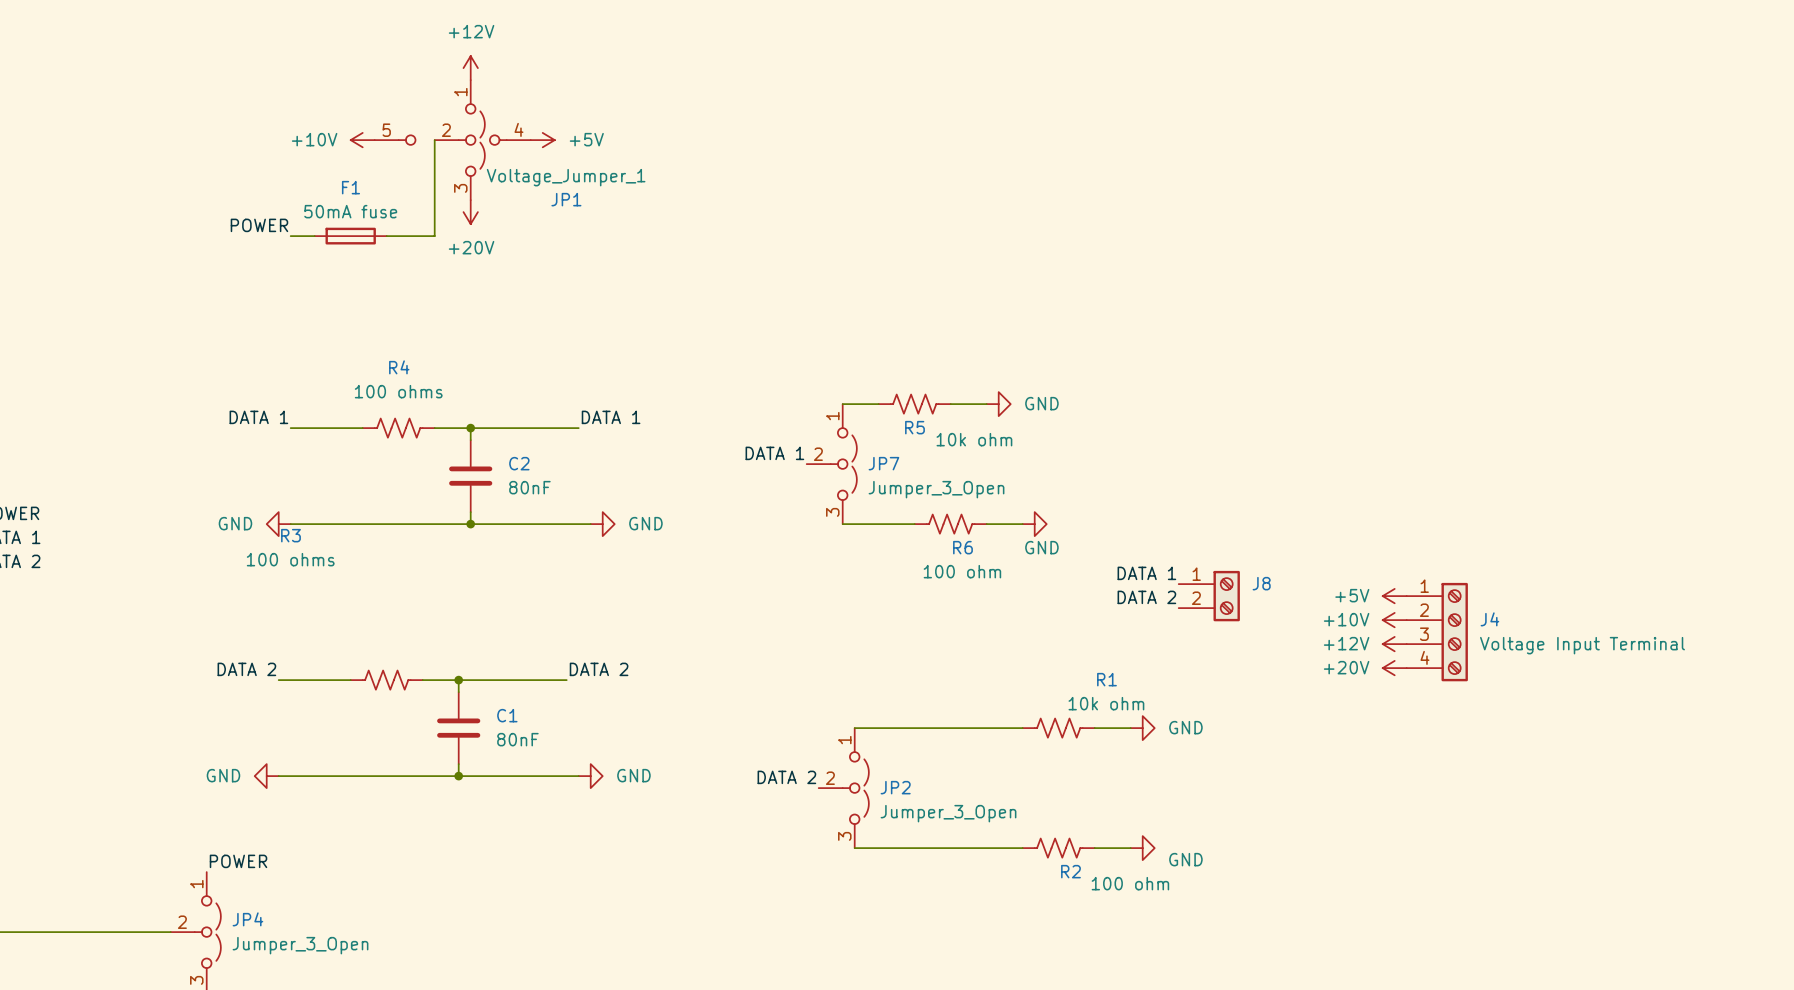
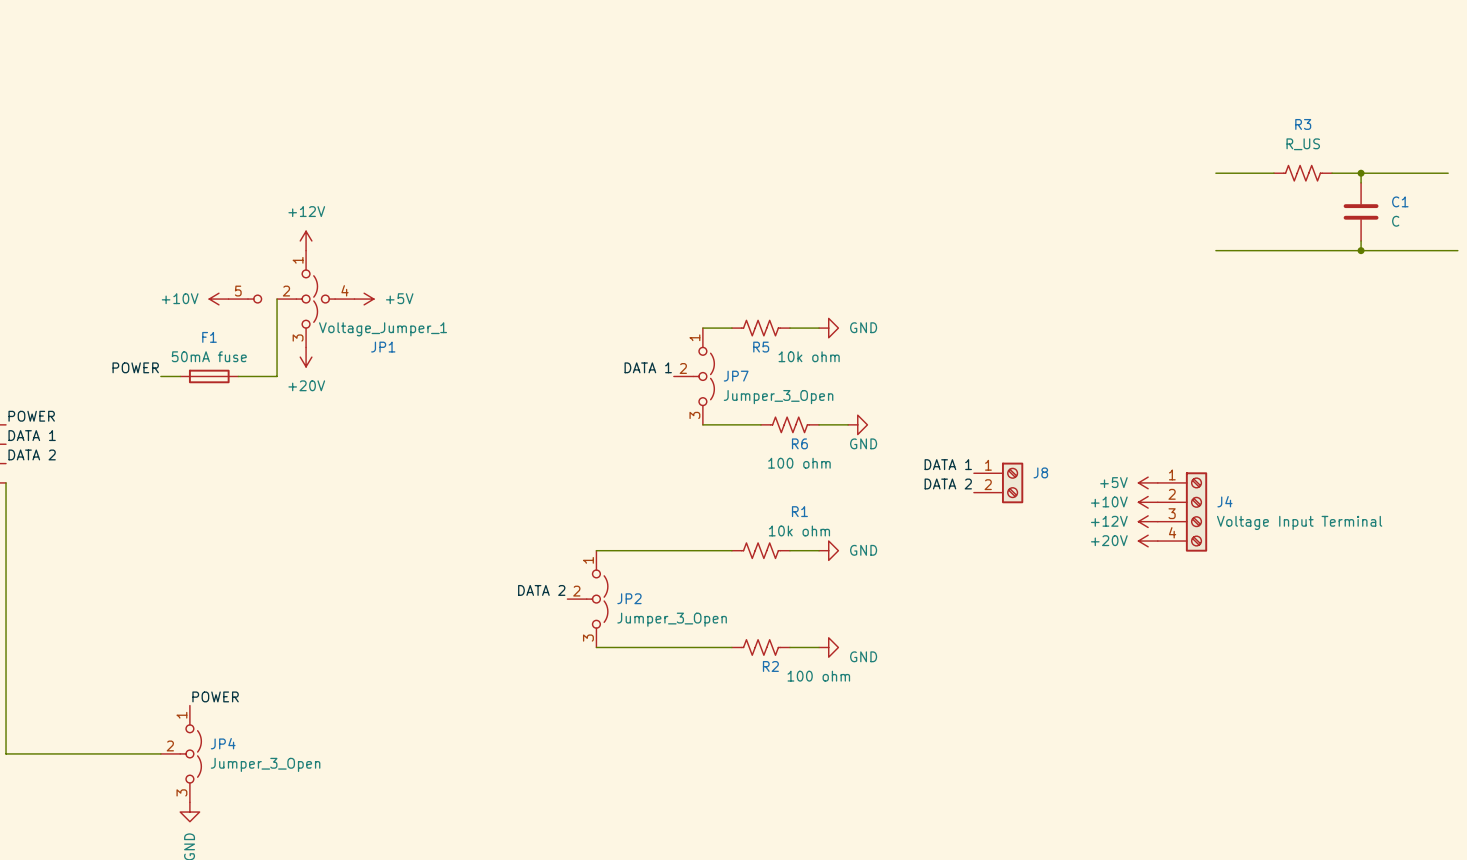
power symbol: +12V (470, 68) -> none
power symbol: +10V (362, 140) -> none
wire: (434, 140) (434, 236) (386, 236) -> none
JP1 position: (452, 140) -> (291, 299)
power symbol: +5V (542, 140) -> none
power symbol: +20V (470, 212) -> none
wire: none -> (1215, 173) (1273, 173)
wire: none -> (1332, 173) (1448, 173)
wire: none -> (1361, 173) (1361, 182)
junction: none -> (1361, 173)
label: POWER (259, 225) -> none
wire: (290, 236) (314, 236) -> none
F1 position: (350, 236) -> (209, 376)
power symbol: none -> +12V (306, 240)
wire: none -> (1361, 240) (1361, 250)
wire: none -> (1215, 250) (1457, 250)
junction: none -> (1361, 250)
power symbol: none -> +10V (218, 299)
wire: none -> (277, 299) (277, 376) (238, 376)
power symbol: none -> +5V (364, 299)
label: DATA 1 (258, 417) -> none
label: DATA 1 (611, 417) -> none
wire: (290, 428) (362, 428) -> none
R4: 100 ohms (398, 428) -> none
wire: (434, 428) (578, 428) -> none
wire: (470, 428) (470, 440) -> none
junction: (470, 428) -> none
power symbol: none -> +20V (306, 357)
label: none -> POWER (135, 367)
wire: none -> (160, 376) (180, 376)
C2: 80nF (470, 476) -> none
wire: (470, 512) (470, 524) -> none
power symbol: GND (278, 524) -> none
wire: (290, 524) (590, 524) -> none
junction: (470, 524) -> none
power symbol: GND (602, 524) -> none
R3 name position: R3 (290, 535) -> R3 (1303, 124)
R3 value: 100 ohms (290, 559) -> R_US (1303, 144)
label: DATA 2 (246, 669) -> none
label: DATA 2 (599, 669) -> none
wire: (278, 680) (350, 680) -> none
R3 position: (386, 680) -> (1302, 173)
wire: (422, 680) (566, 680) -> none
wire: (458, 680) (458, 692) -> none
junction: (458, 680) -> none
power symbol: none -> GND (828, 550)
C1 position: (458, 728) -> (1361, 211)
wire: (854, 728) (1022, 728) -> (596, 550) (731, 550)
R1 position: (1058, 728) -> (760, 550)
wire: (1094, 728) (1130, 728) -> (790, 550) (819, 550)
power symbol: GND (1142, 728) -> none
label: none -> DATA 2 (541, 590)
C1 value: 80nF (517, 739) -> C (1395, 221)
wire: (458, 764) (458, 776) -> none
power symbol: GND (266, 776) -> none
wire: (278, 776) (578, 776) -> none
junction: (458, 776) -> none
power symbol: GND (590, 776) -> none
label: DATA 2 (786, 777) -> none
JP2 position: (843, 788) -> (587, 599)
power symbol: none -> GND (828, 647)
wire: (854, 848) (1022, 848) -> (596, 647) (731, 647)
R2 position: (1058, 848) -> (760, 647)
wire: (1094, 848) (1130, 848) -> (790, 647) (819, 647)
power symbol: GND (1142, 848) -> none

